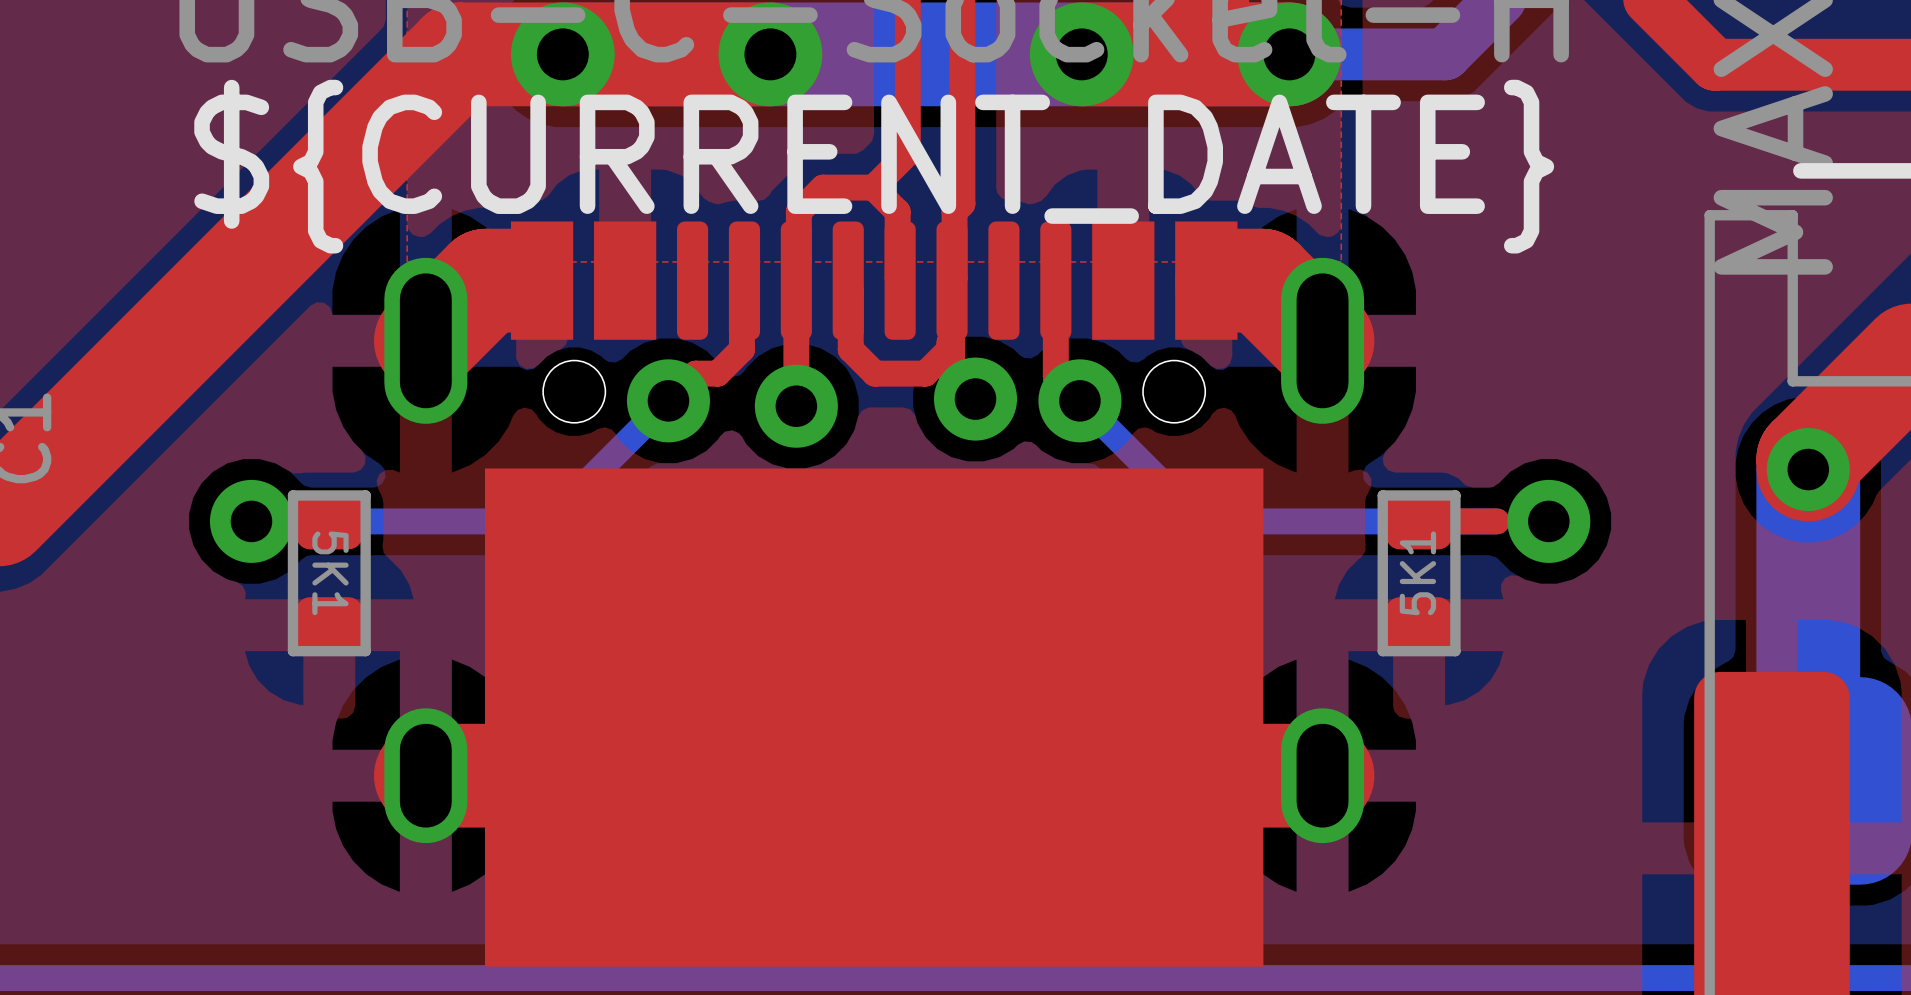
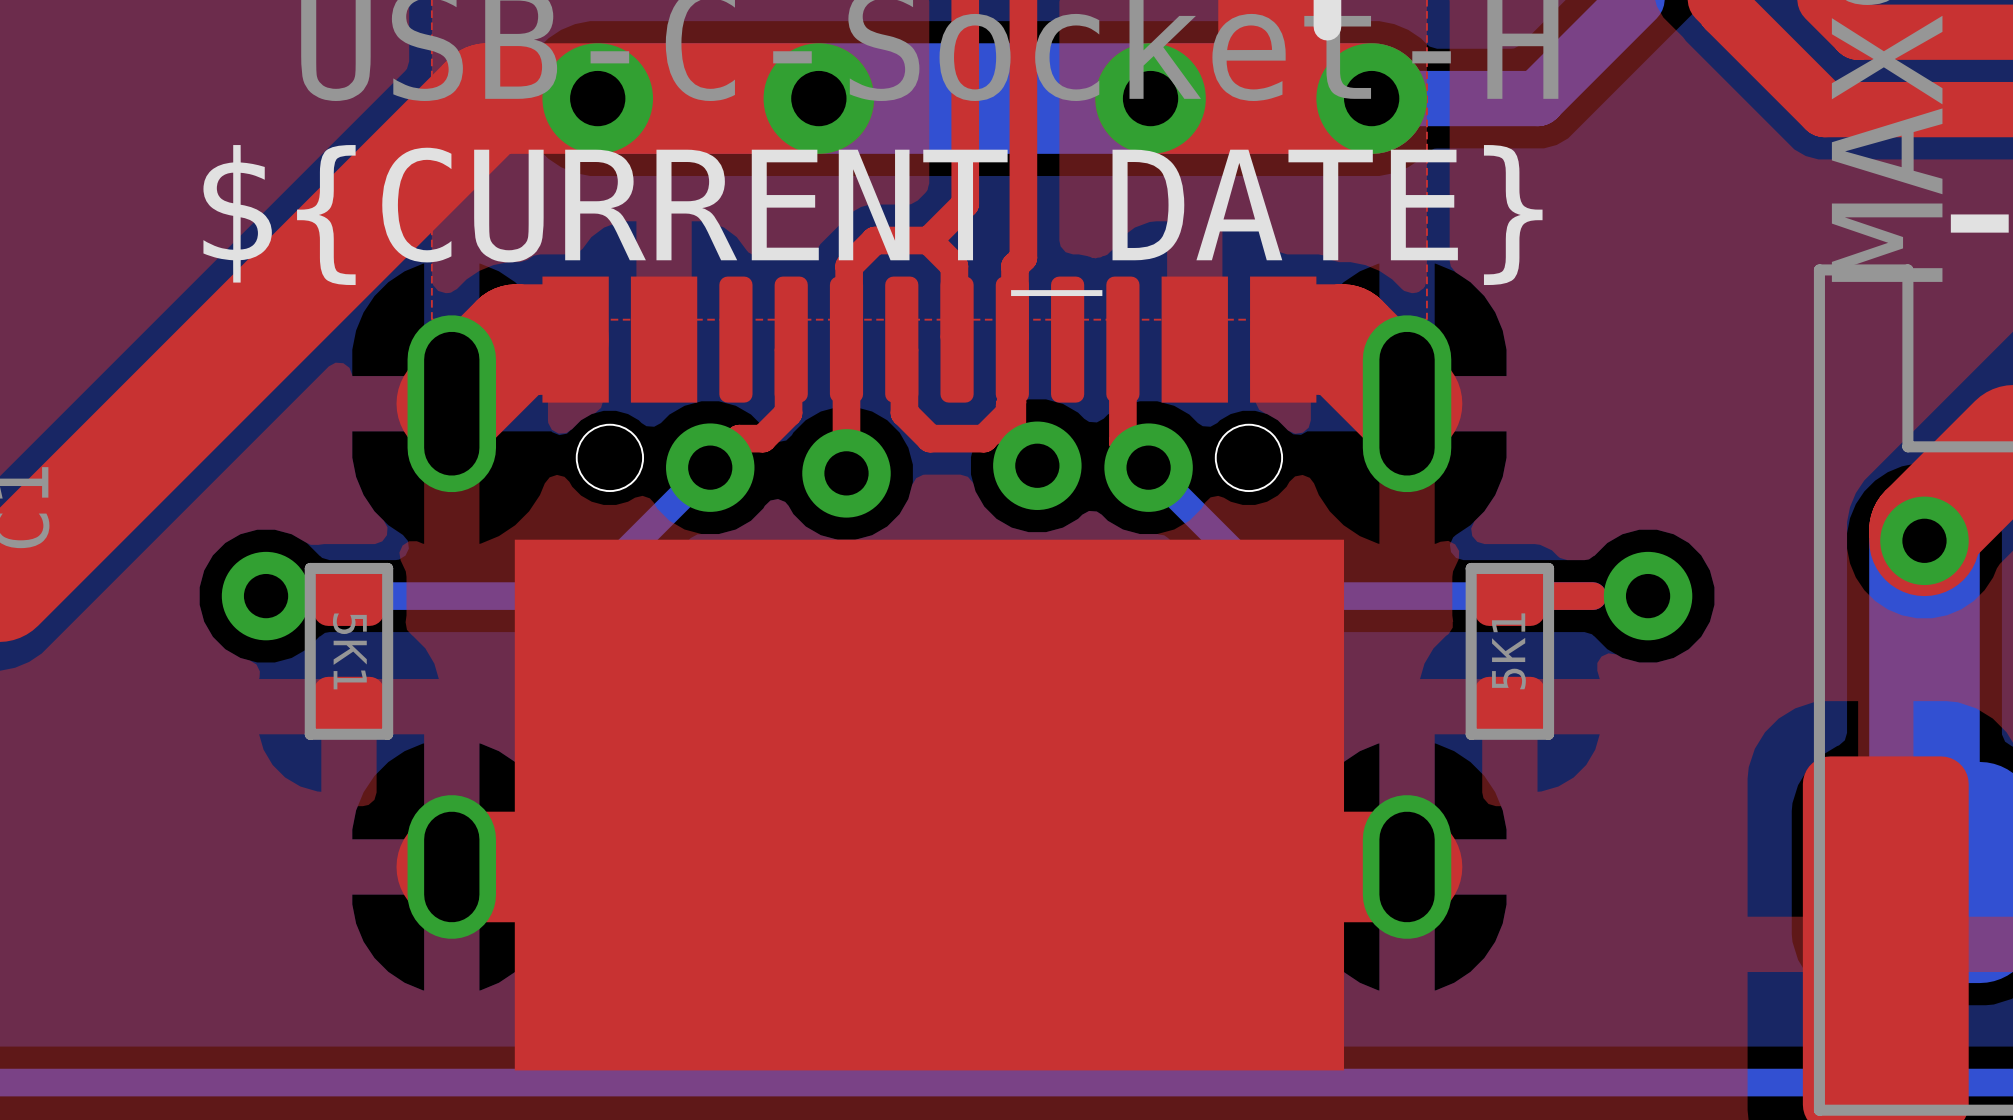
text position: ${CURRENT_DATE} (874, 166) -> ${CURRENT_DATE} (872, 220)

